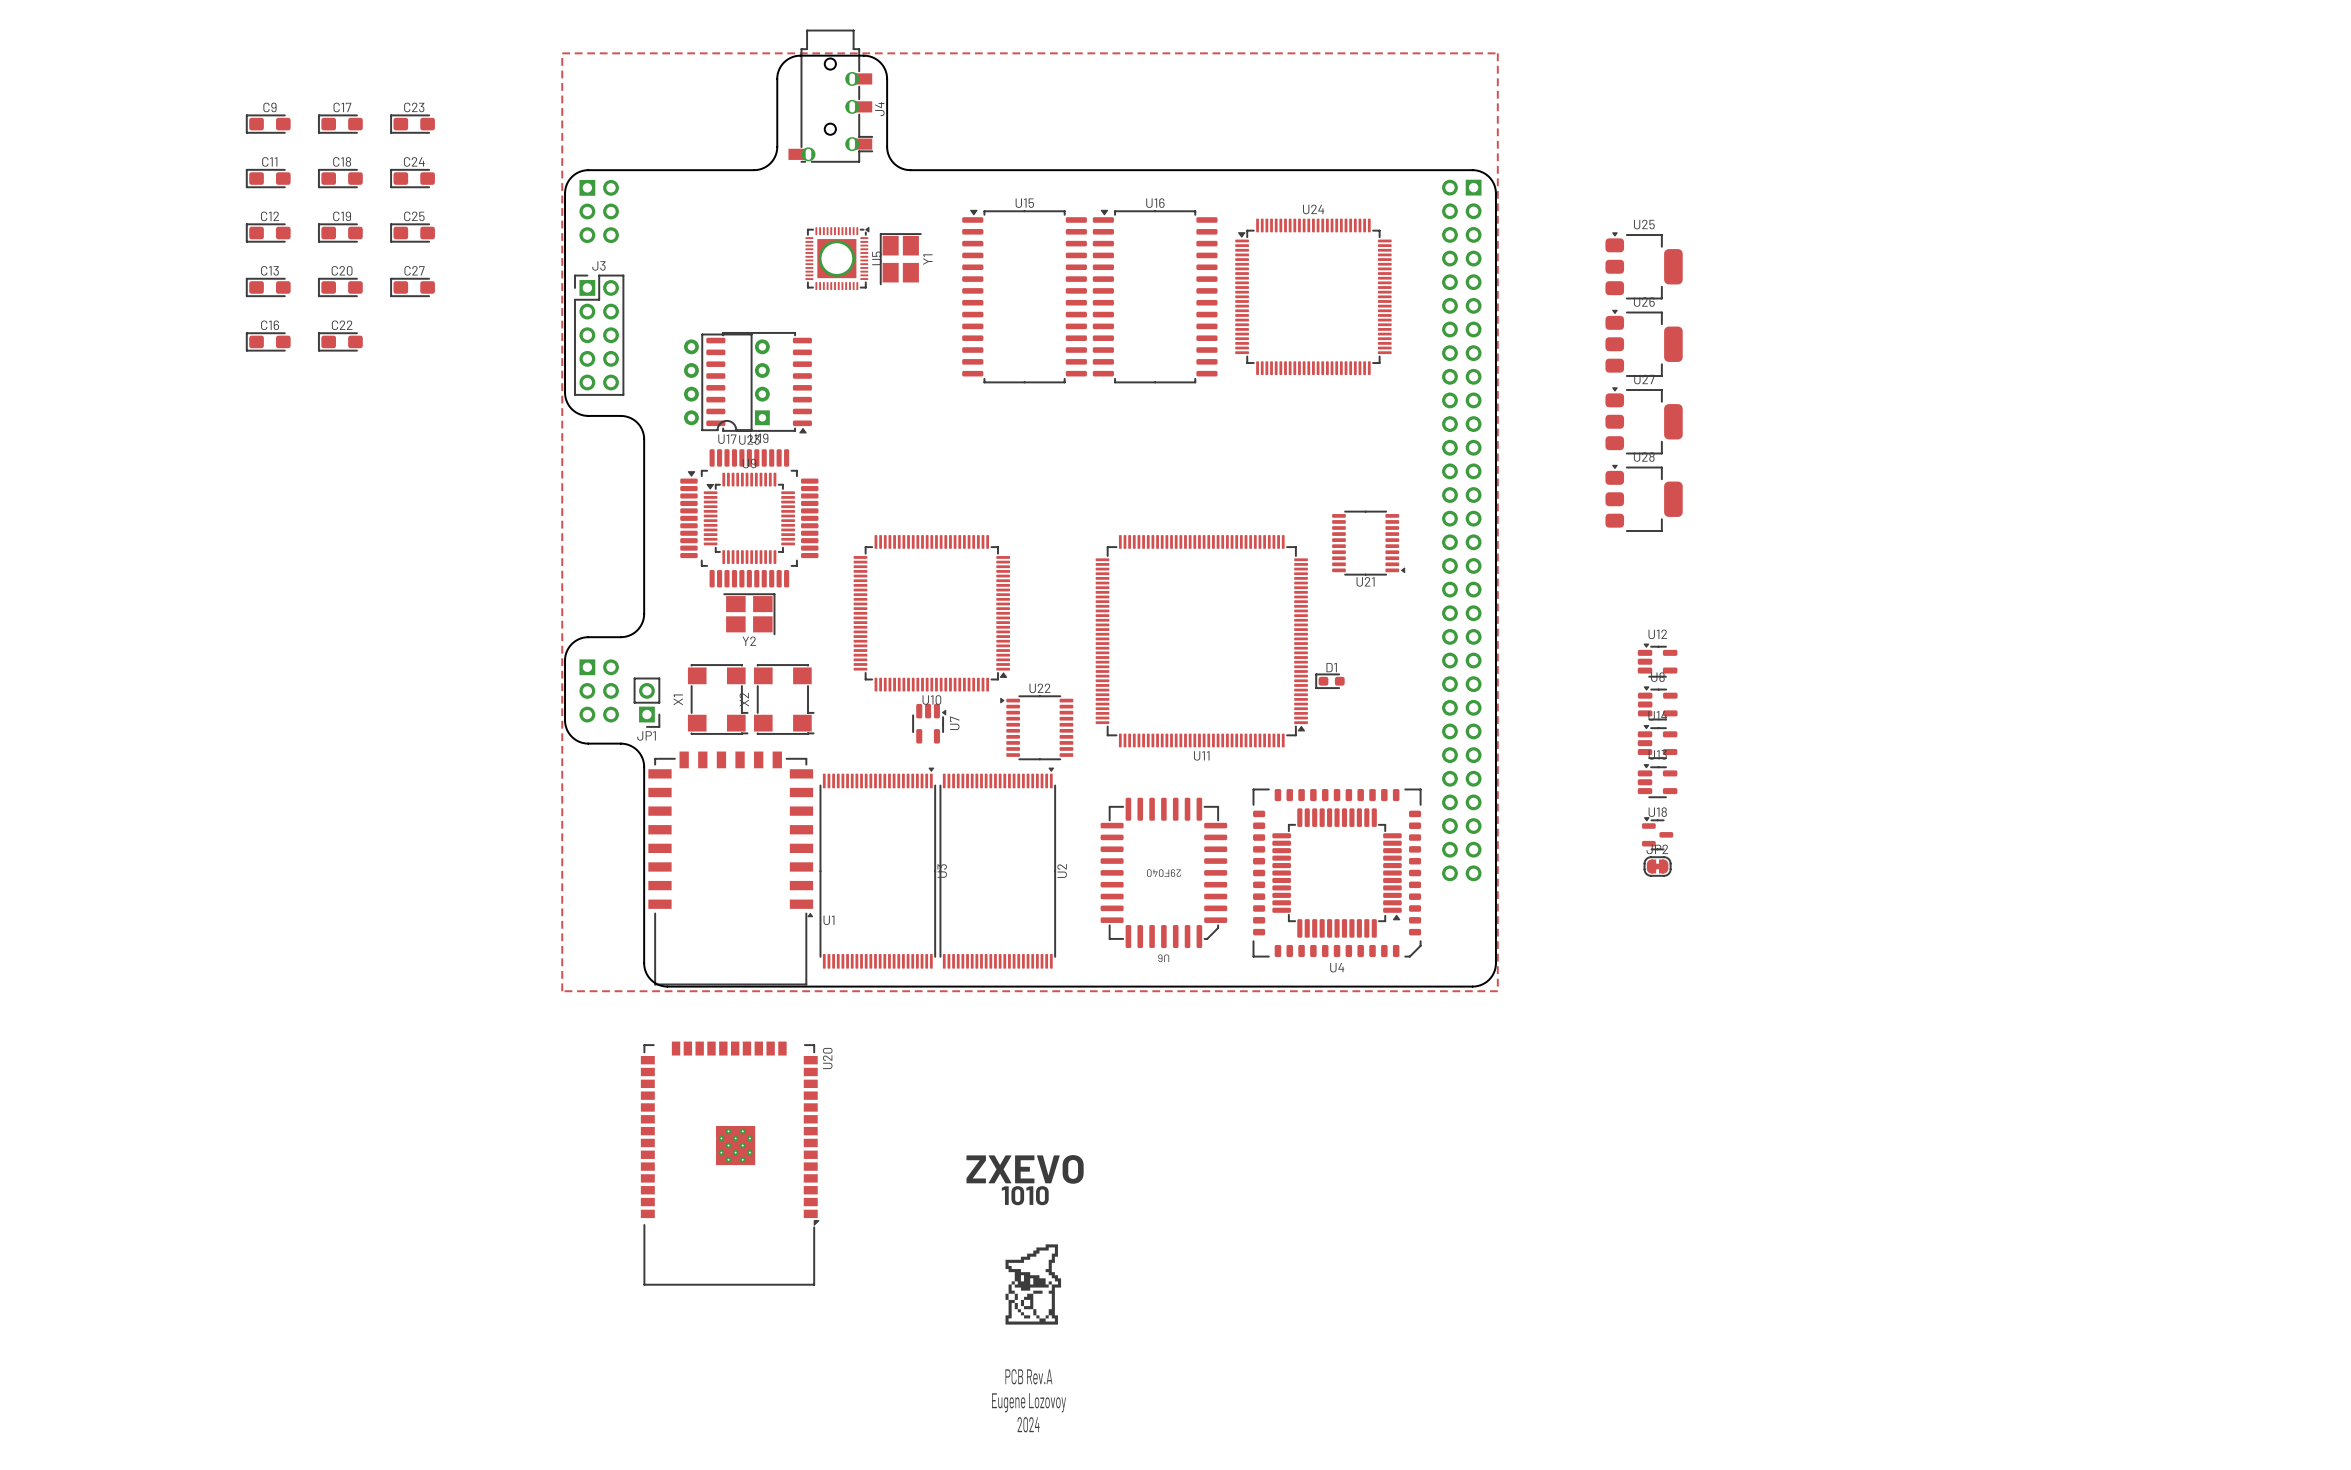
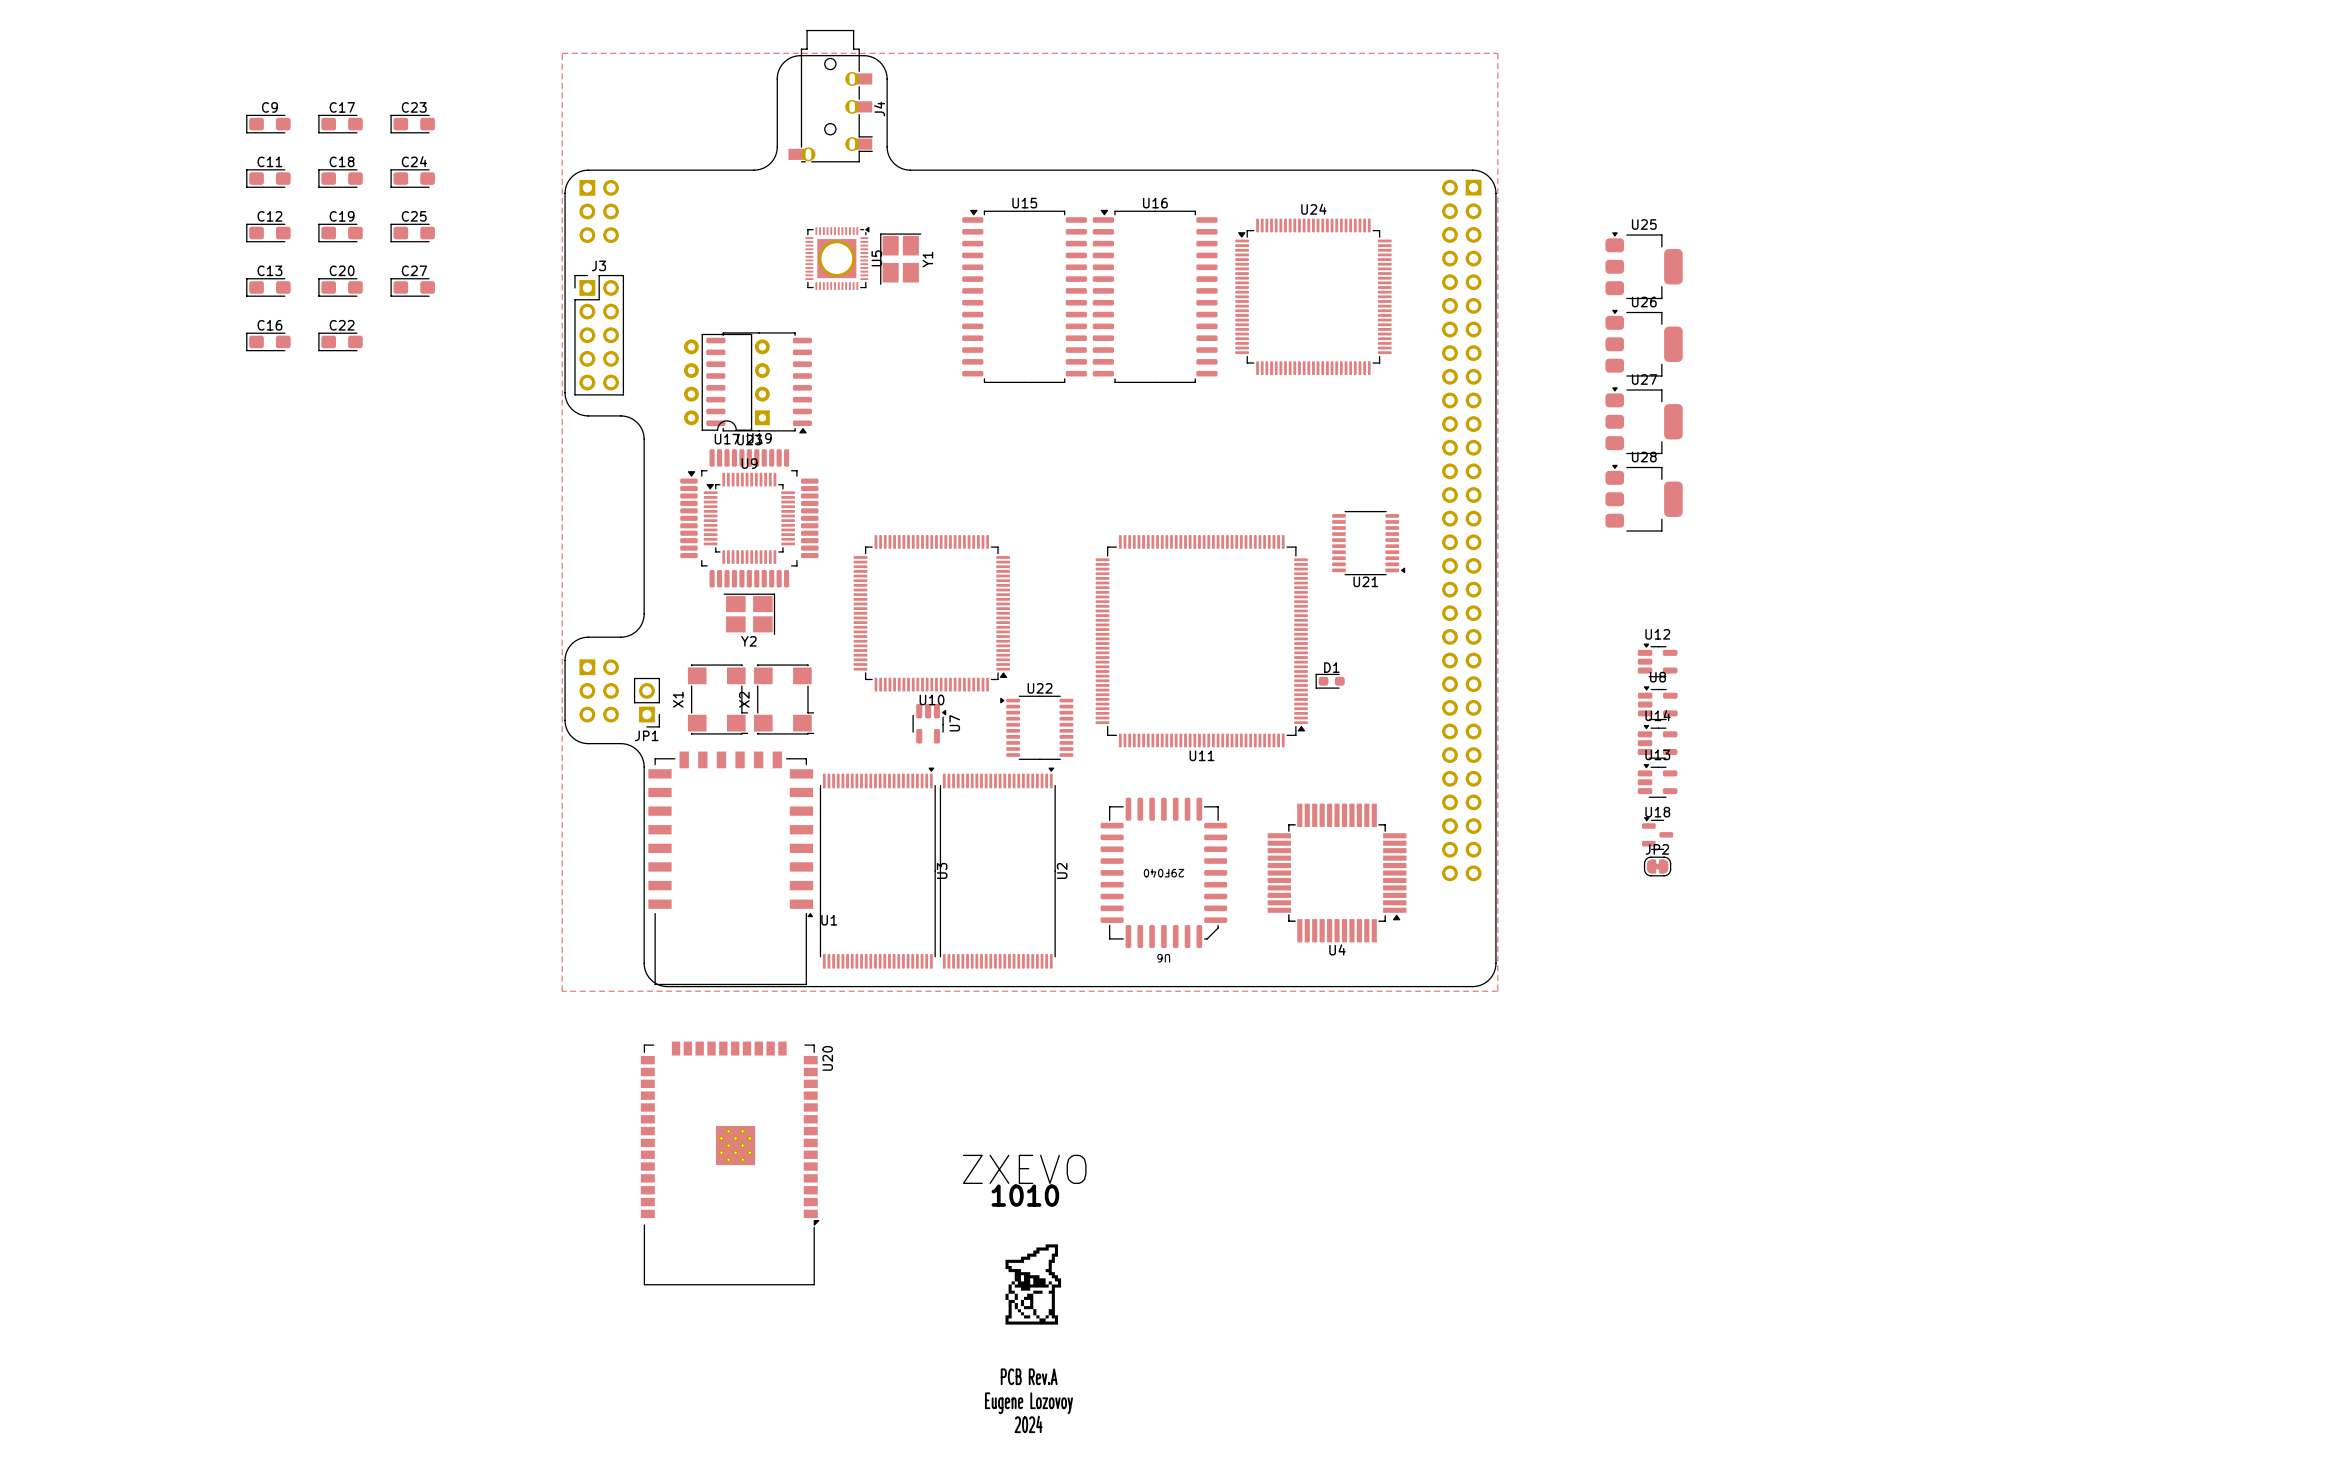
U4 footprint: [1253, 789, 1422, 958] -> [1267, 803, 1407, 943]

